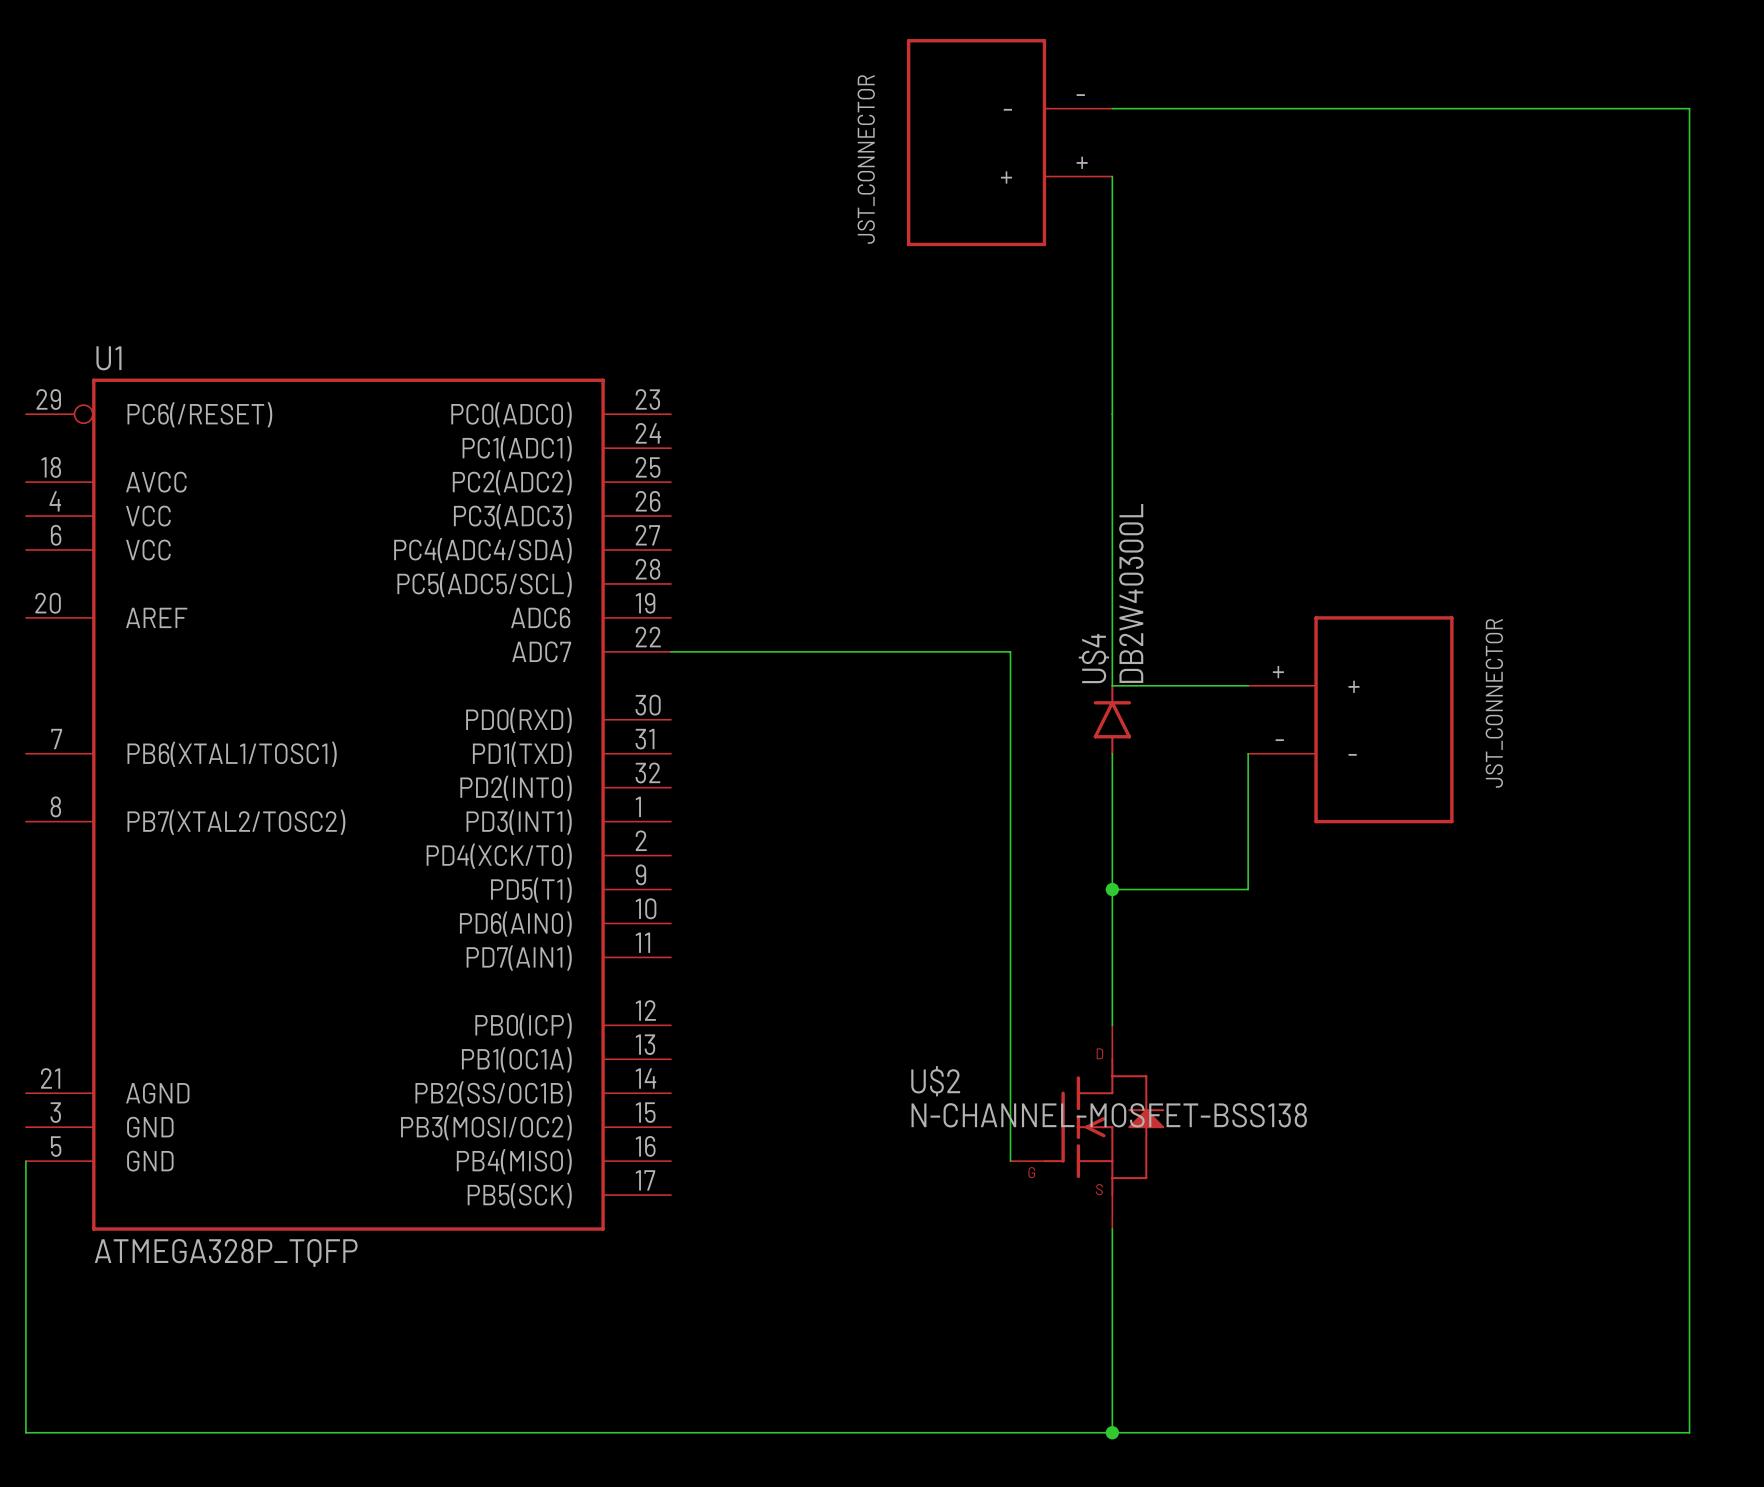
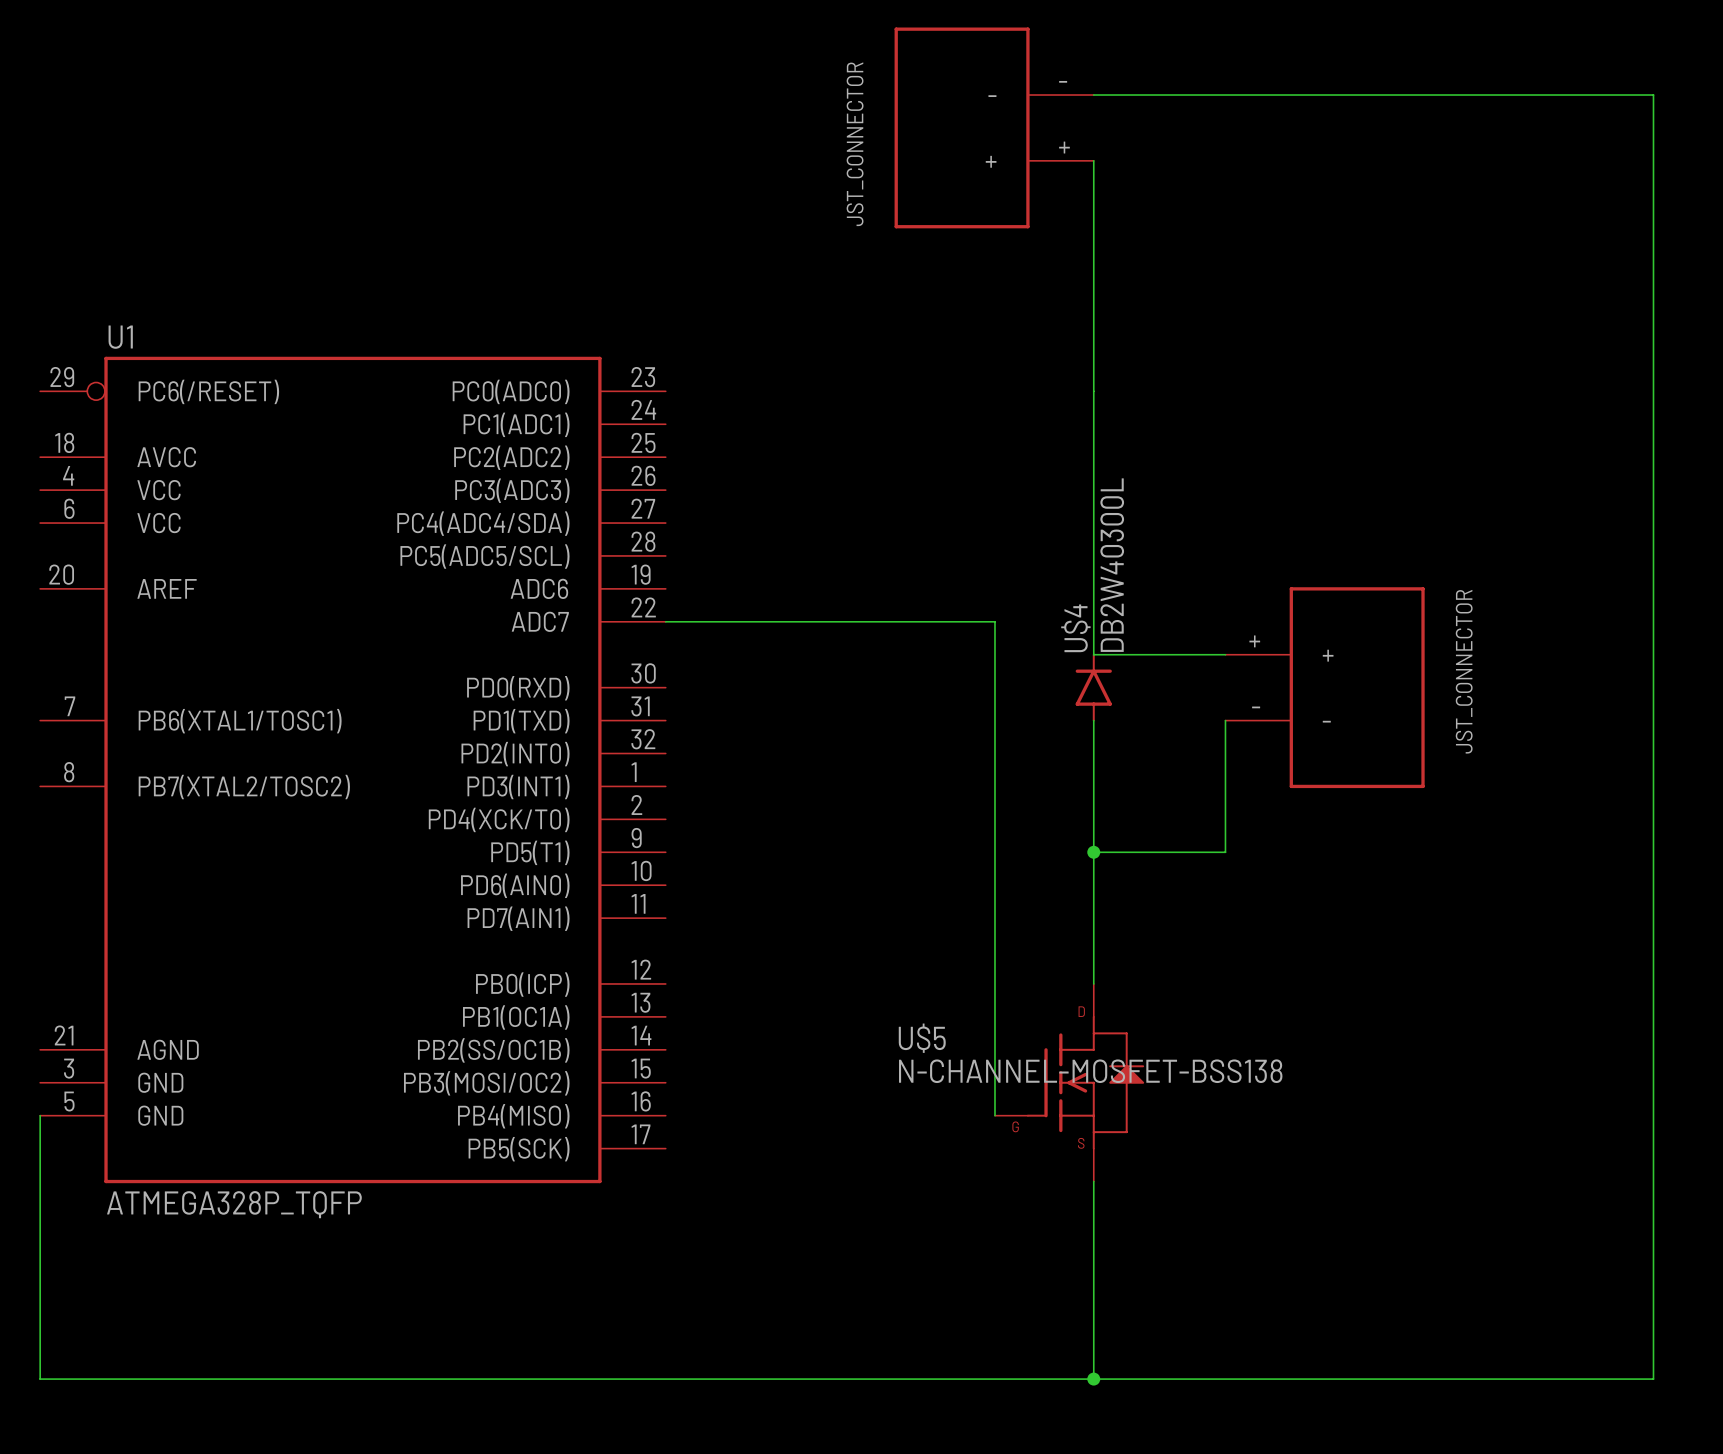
U$2 name: U$2 (935, 1081) -> U$5 (922, 1038)

